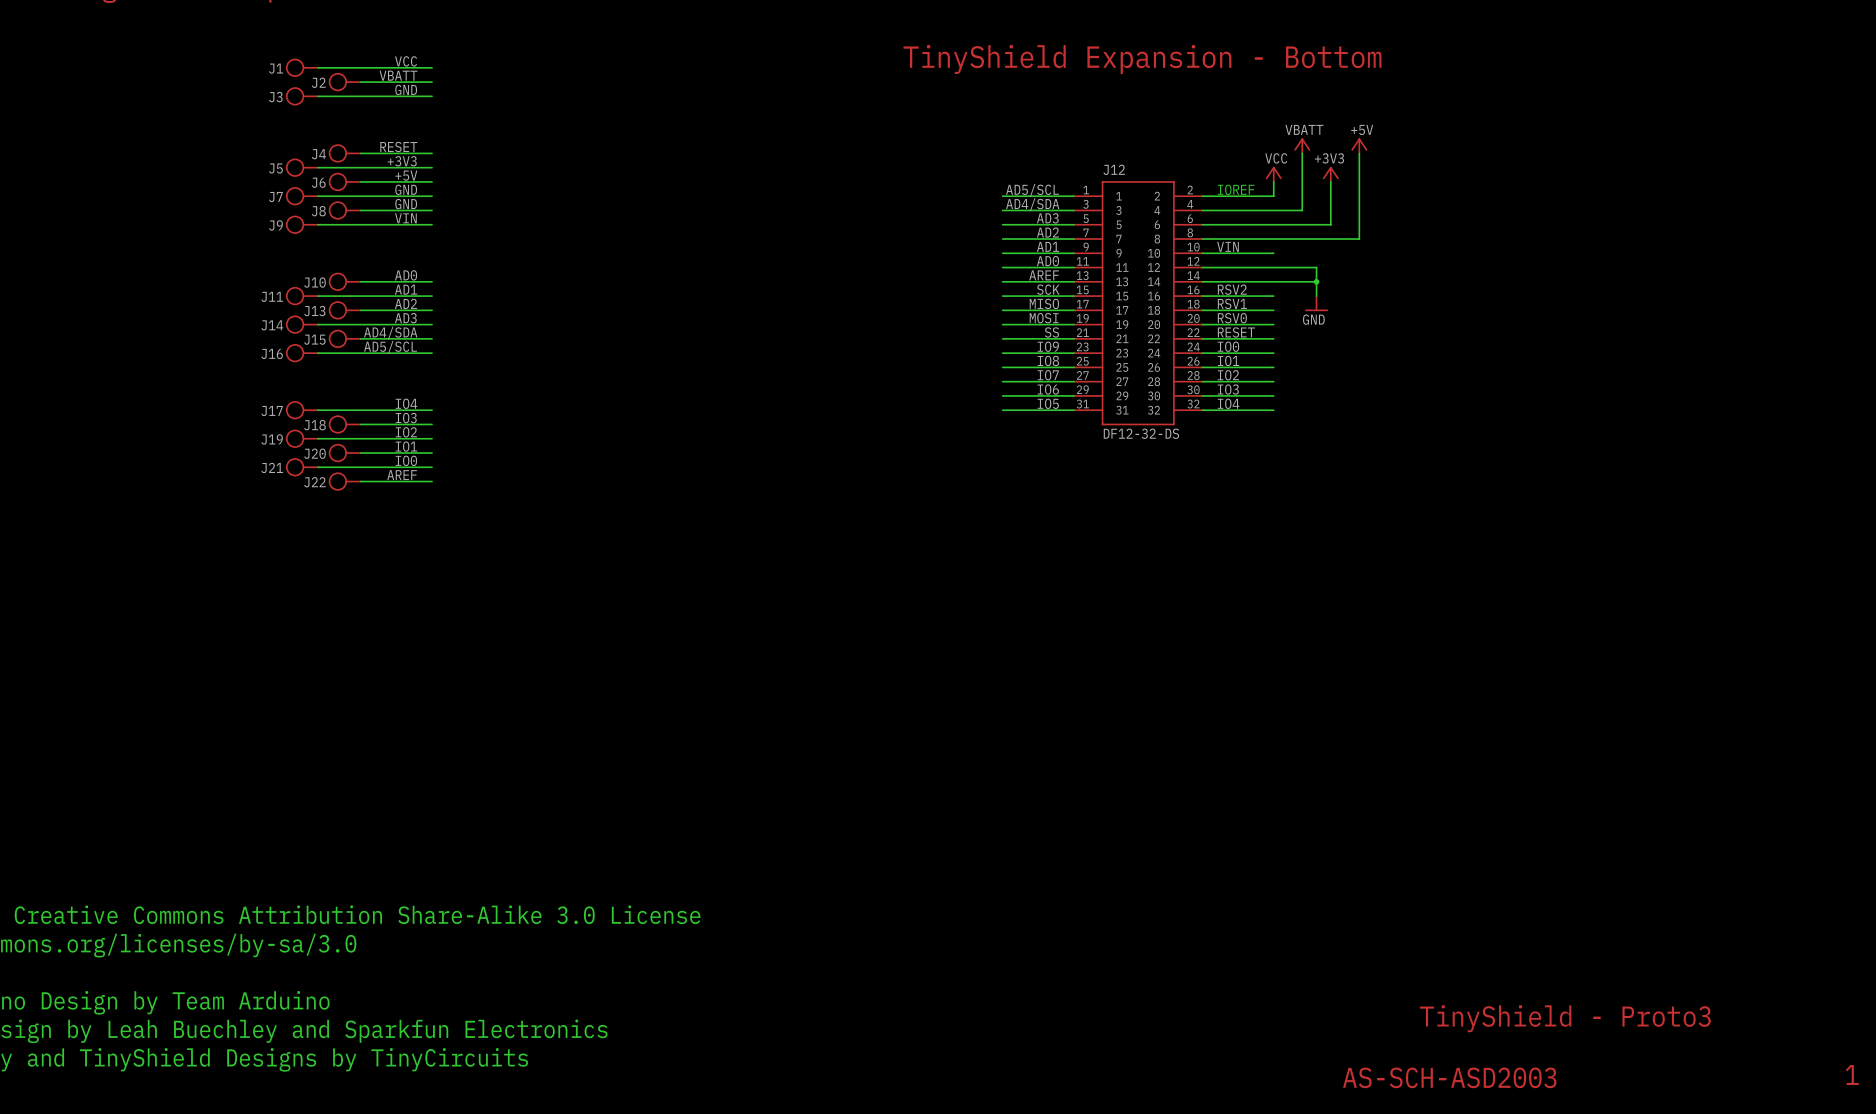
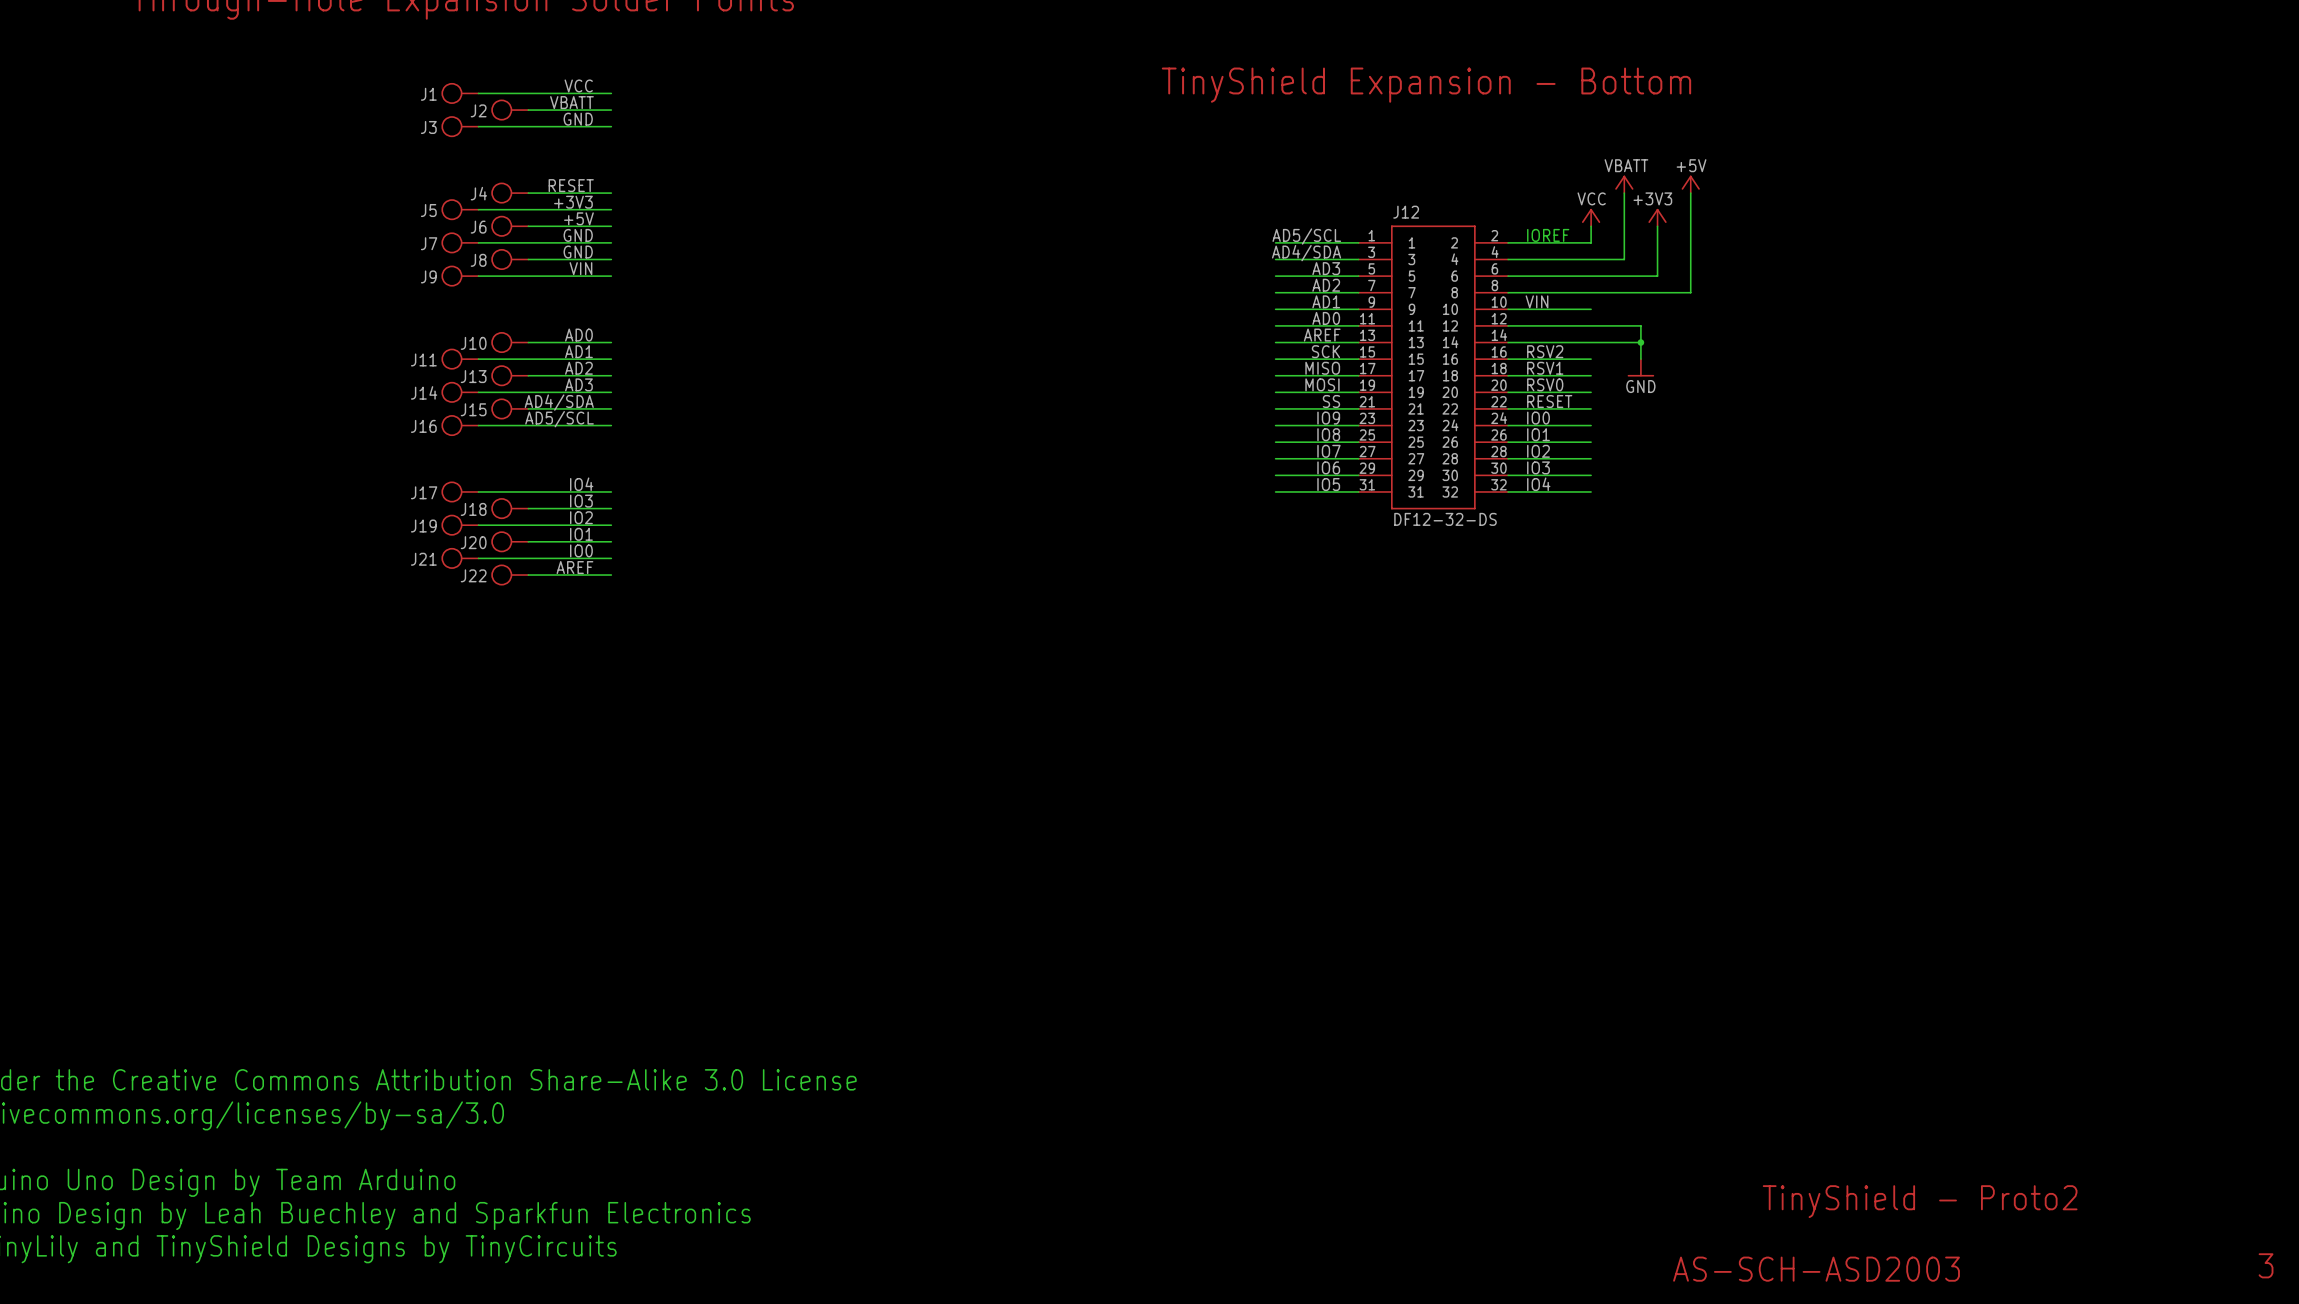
text: TinyShield - Proto3 (1565, 1018) -> TinyShield - Proto2 (1920, 1201)
text: 1 (1852, 1075) -> 3 (2266, 1265)

